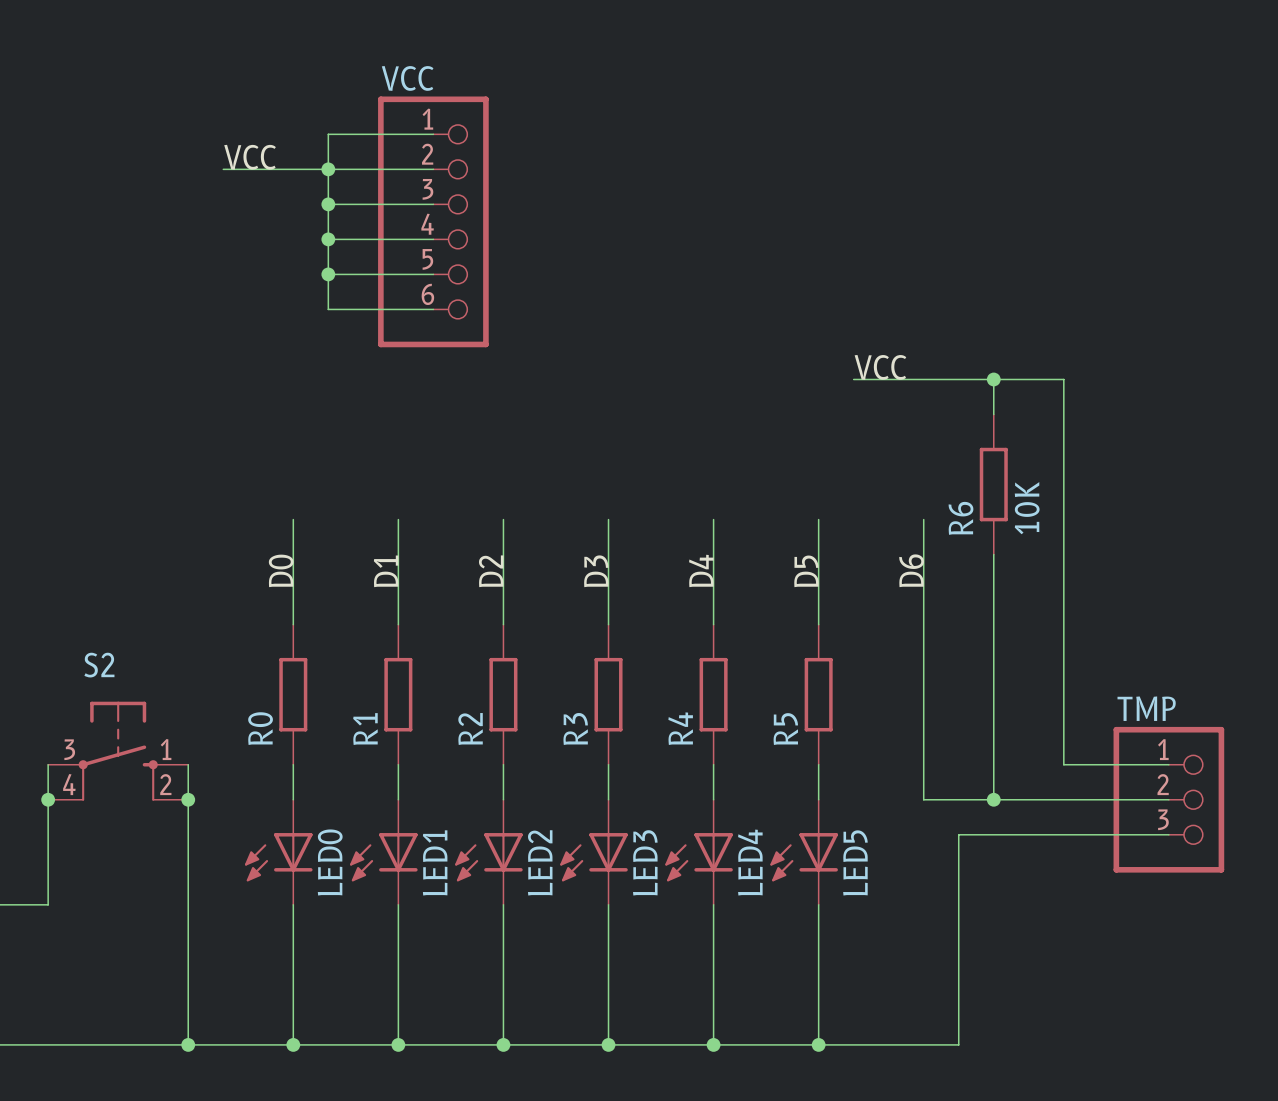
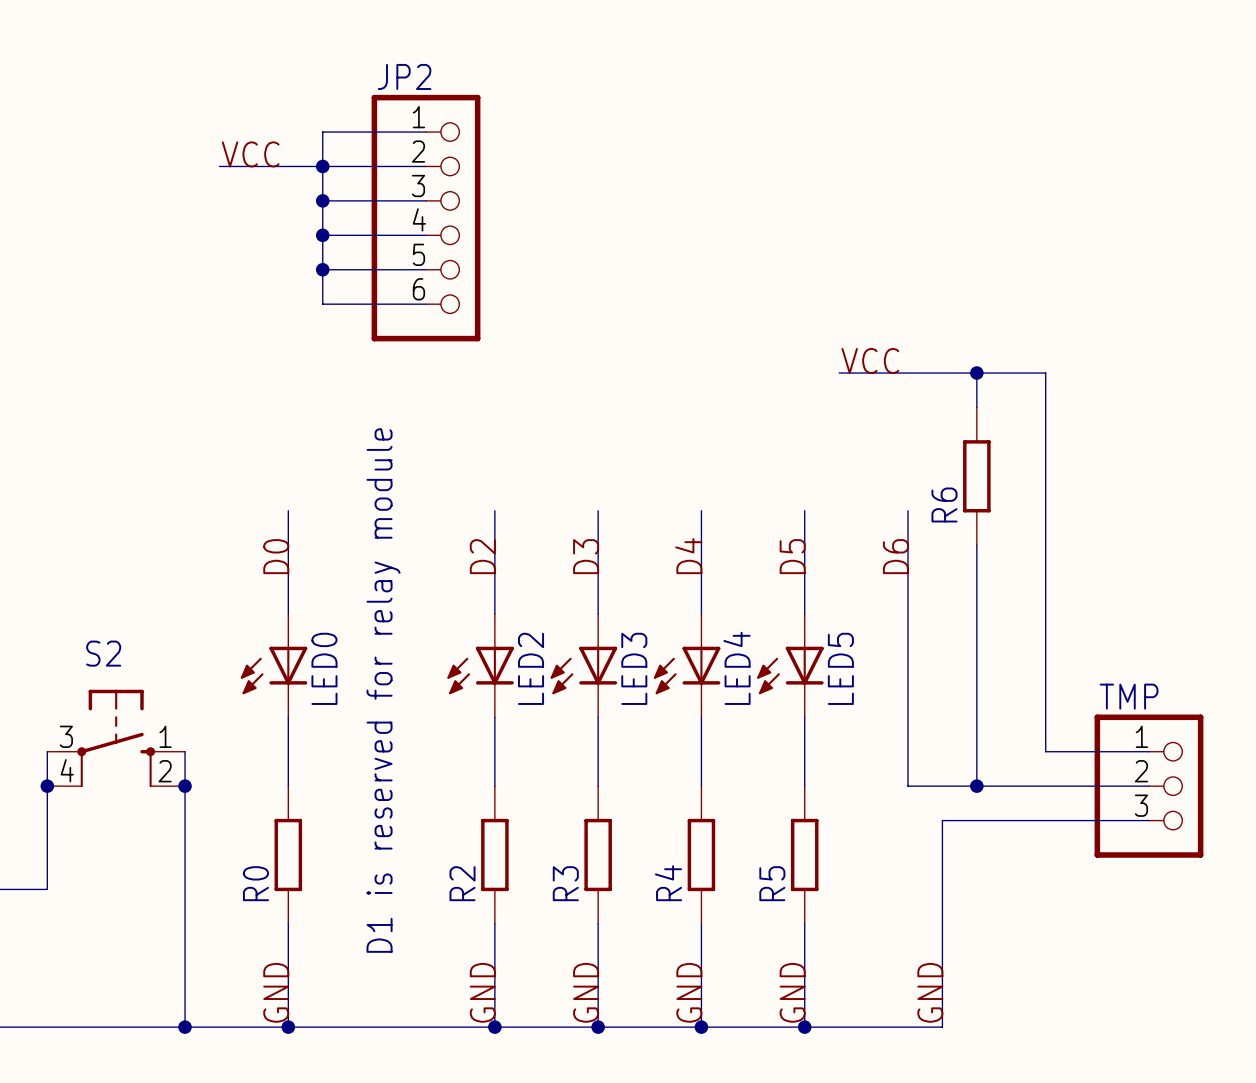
VCC name: VCC (407, 78) -> JP2 (404, 76)
R6 value: 10K (1027, 508) -> none
wire: (398, 519) (398, 624) -> none
label: D1 (386, 571) -> none
R0 position: (293, 694) -> (288, 855)
R1: (398, 694) -> none
R2 position: (503, 694) -> (494, 855)
R3 position: (608, 694) -> (598, 855)
R4 position: (713, 694) -> (701, 855)
R5 position: (818, 694) -> (804, 855)
text: none -> D1 is reserved for relay module (383, 690)
wire: (398, 764) (398, 799) -> none
LED0 position: (278, 852) -> (274, 665)
LED1: (383, 852) -> none
LED2 position: (488, 852) -> (480, 665)
LED3 position: (593, 852) -> (583, 665)
LED4 position: (699, 852) -> (687, 665)
LED5 position: (804, 852) -> (790, 665)
wire: (398, 904) (398, 1044) -> none
label: none -> GND (276, 992)
label: none -> GND (482, 992)
label: none -> GND (586, 992)
label: none -> GND (689, 992)
label: none -> GND (792, 992)
label: none -> GND (930, 992)
junction: (398, 1044) -> none

